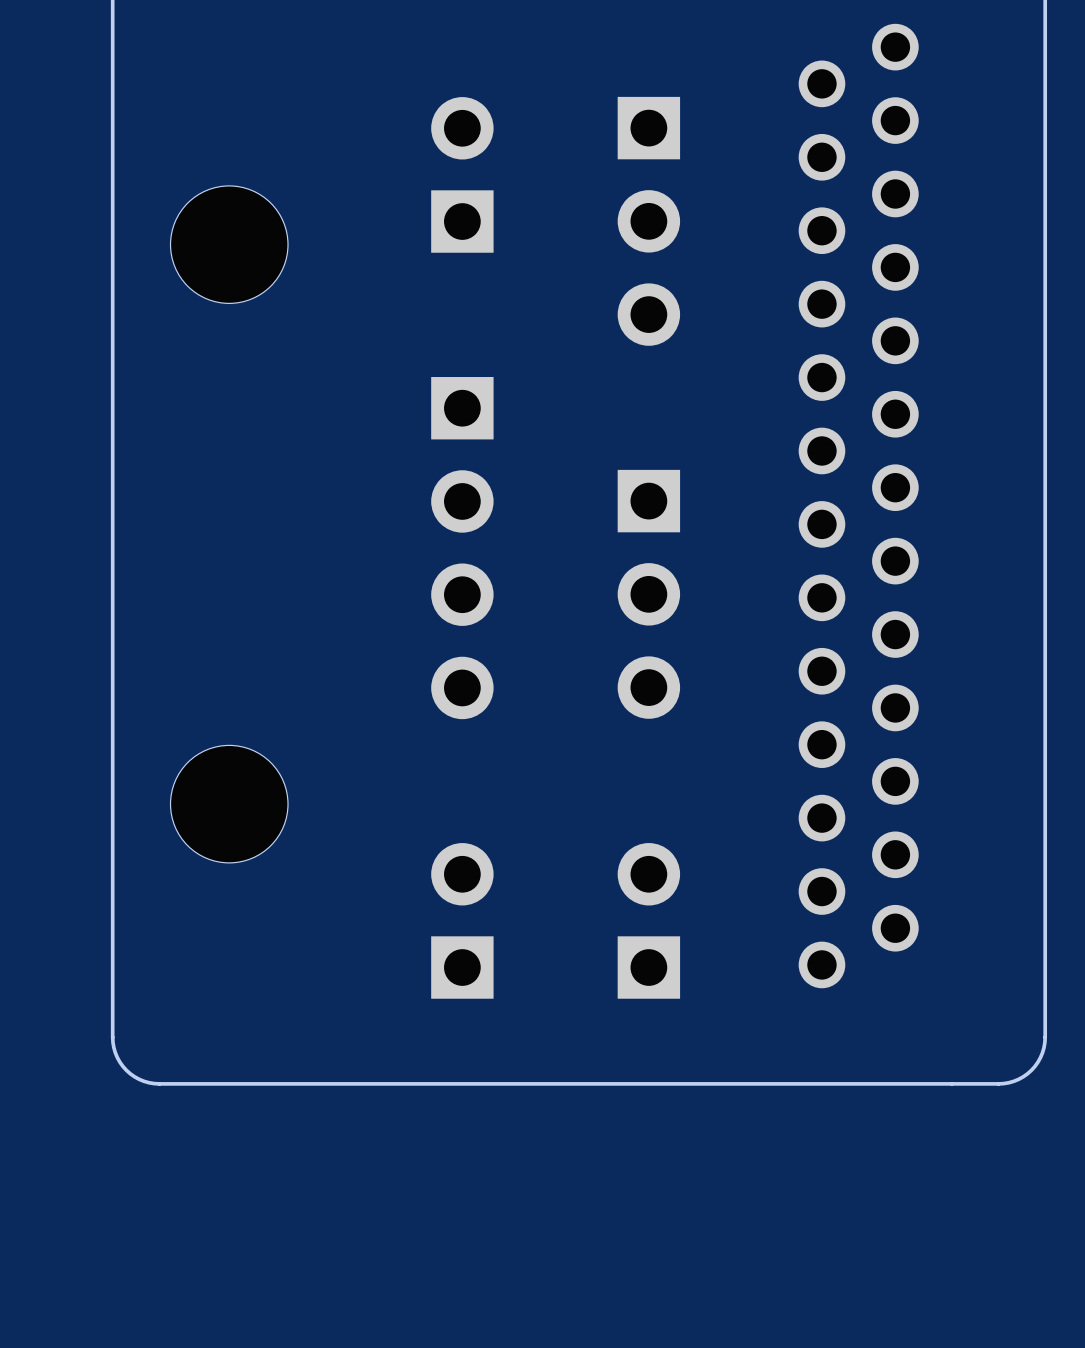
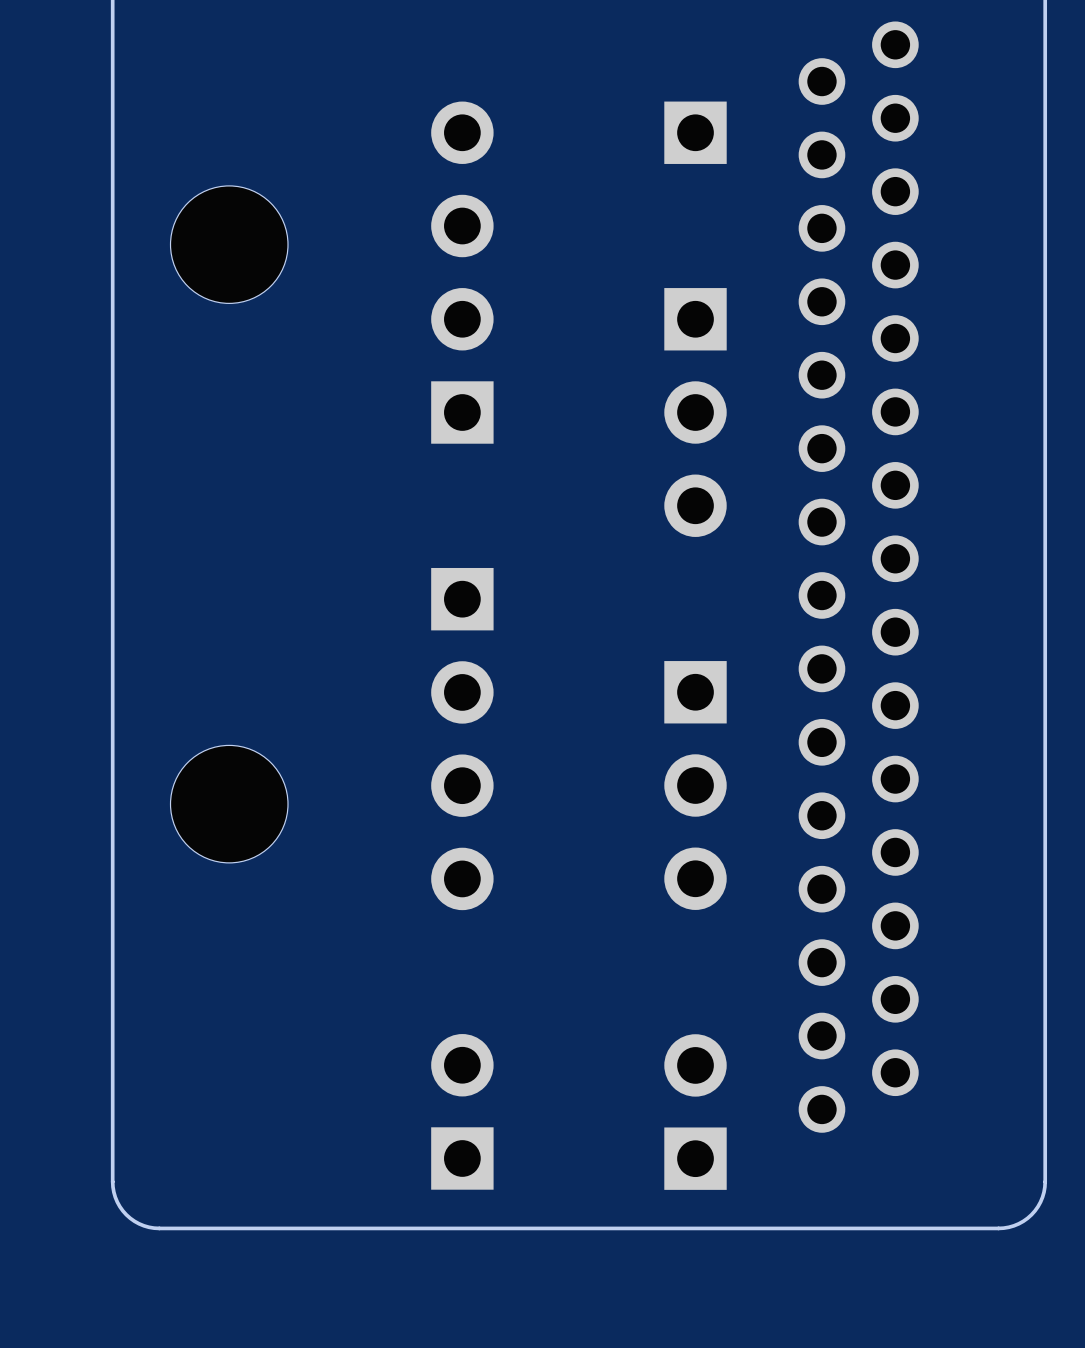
part: none -> (695, 132)
part: (462, 174) -> none
part: (648, 221) -> none
part: none -> (462, 272)
part: none -> (695, 412)
part: (858, 506) -> none
part: (462, 548) -> none
part: none -> (858, 577)
part: (648, 594) -> none
part: none -> (462, 739)
part: none -> (695, 785)
part: (462, 920) -> none
part: (648, 920) -> none
board edge: (1045, 1037) (1042, 1052) (1031, 1070) (1013, 1081) (998, 1083) (159, 1083) (139, 1079) (126, 1070) (115, 1052) (112, 1037) -> (1045, 1037) (1044, 1192) (1038, 1206) (1027, 1218) (1013, 1225) (998, 1228) (148, 1227) (134, 1221) (126, 1214) (117, 1202) (113, 1192) (112, 1037)
part: none -> (462, 1111)
part: none -> (695, 1112)

